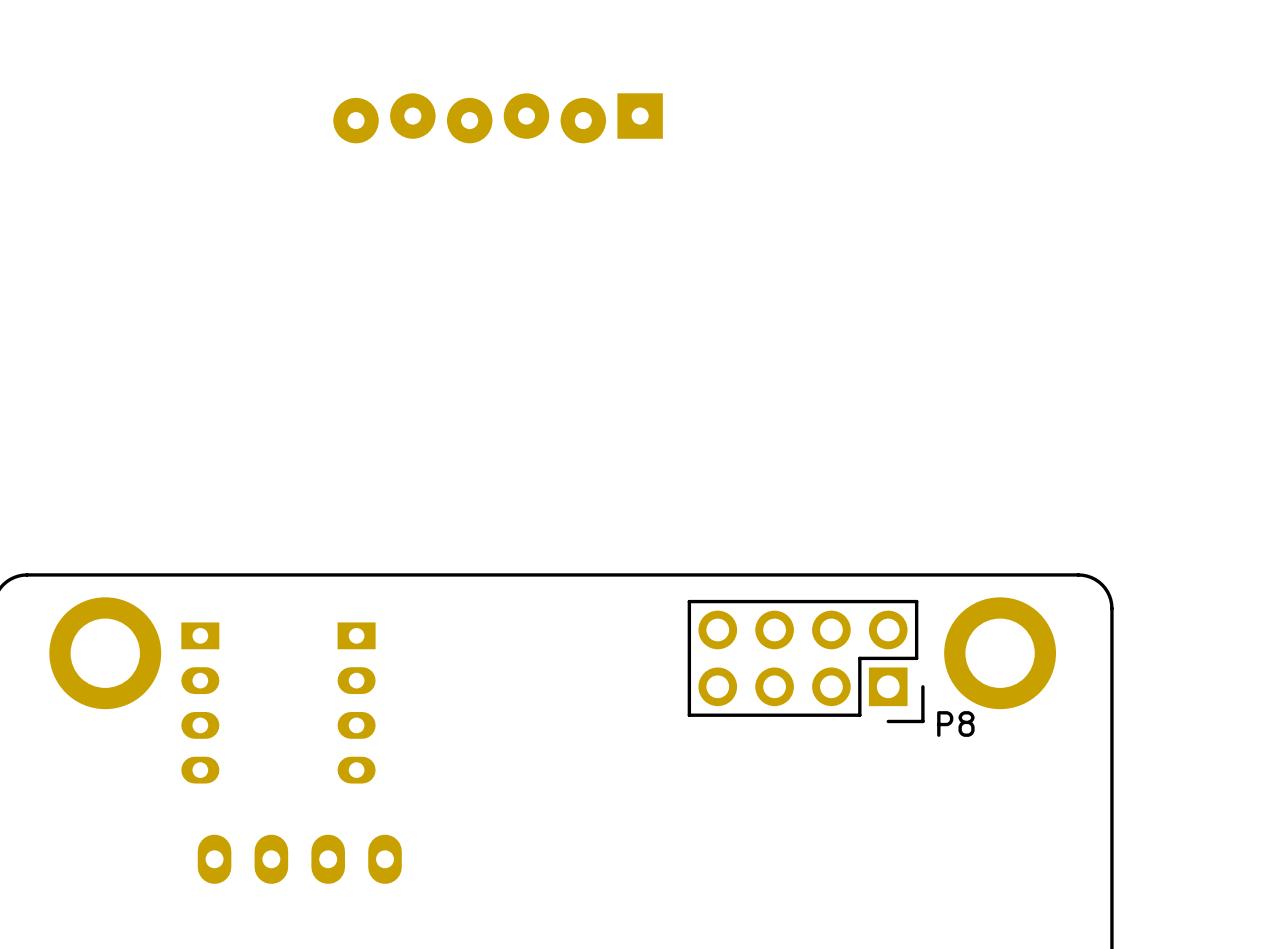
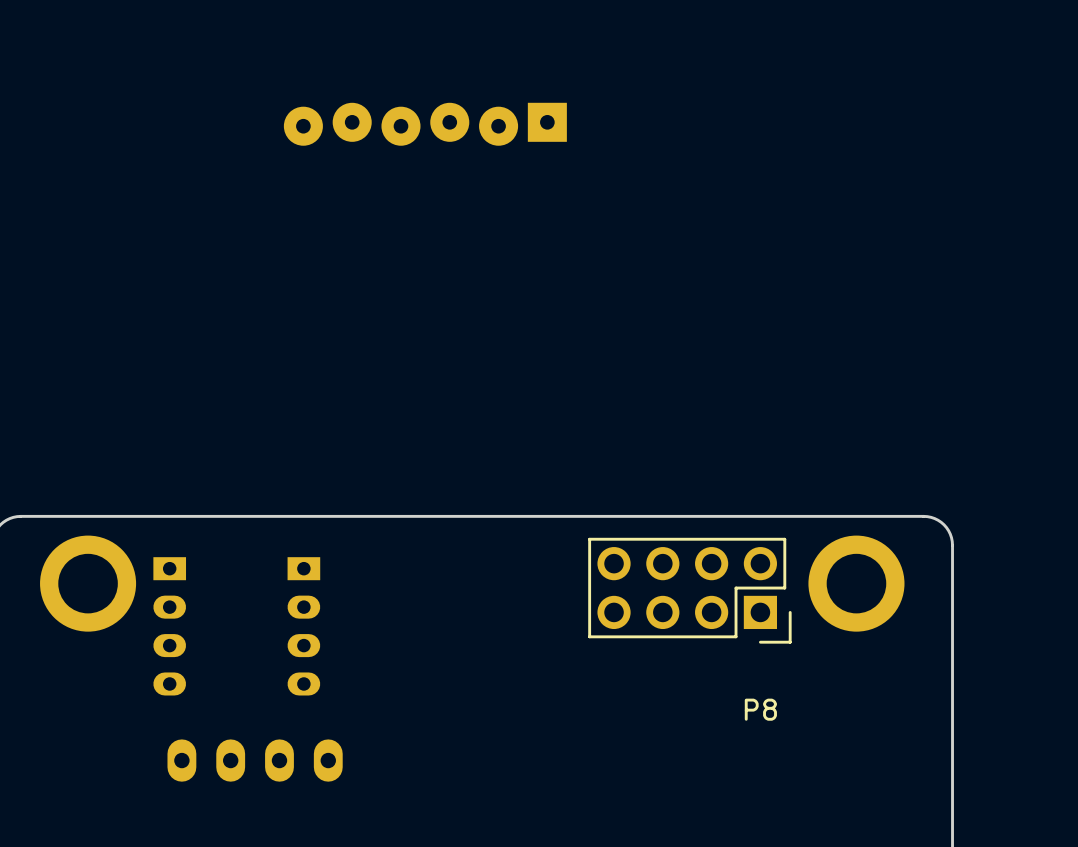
P8 name position: P8 (955, 723) -> P8 (760, 709)

